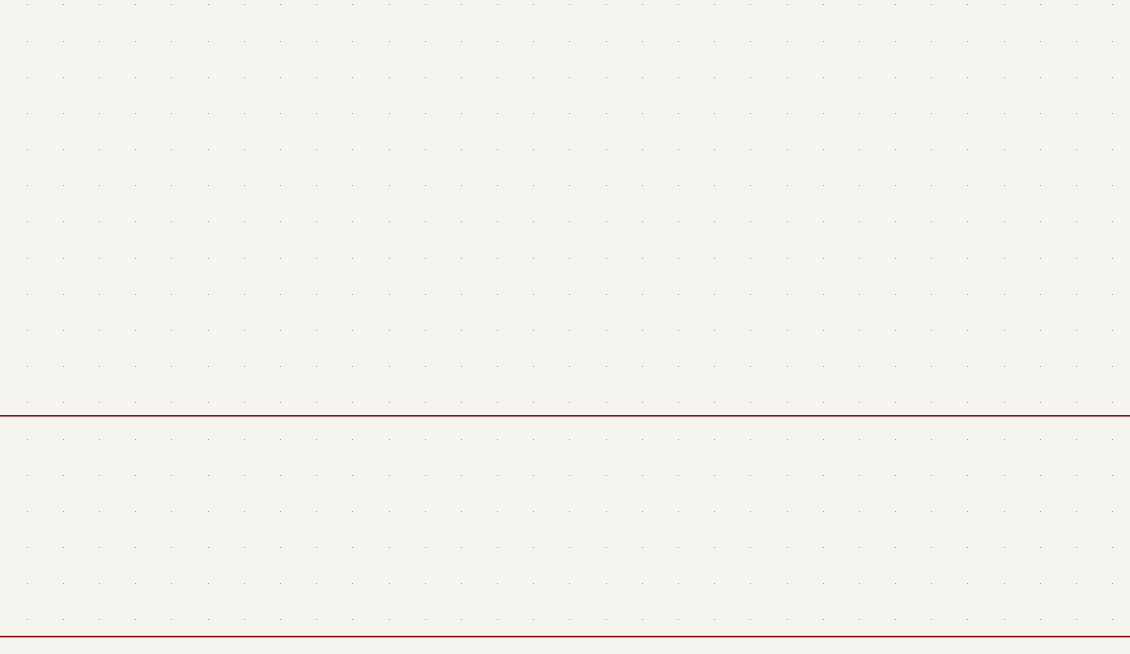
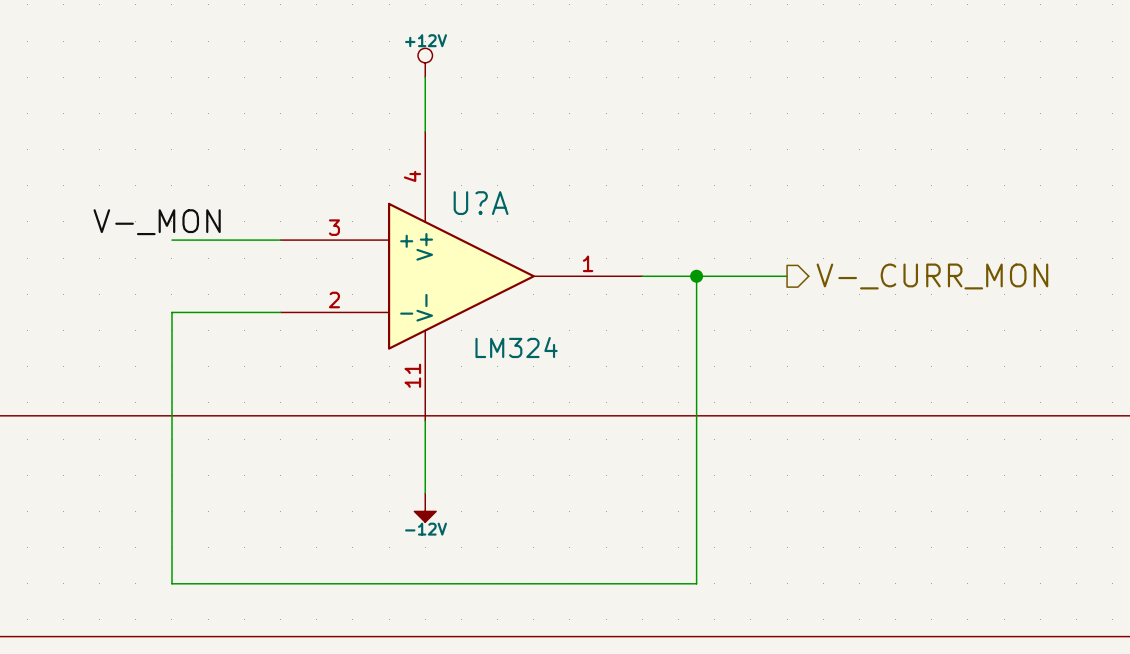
power symbol: none -> +12V (425, 62)
wire: none -> (425, 77) (425, 131)
label: none -> V-_MON (157, 222)
wire: none -> (171, 240) (280, 240)
U?A: none -> LM324 (461, 276)
wire: none -> (642, 276) (787, 276)
wire: none -> (696, 276) (696, 583) (171, 583) (171, 312) (280, 312)
junction: none -> (696, 276)
hierarchical label: none -> V-_CURR_MON (932, 276)
wire: none -> (425, 420) (425, 493)
power symbol: none -> -12V (425, 507)

